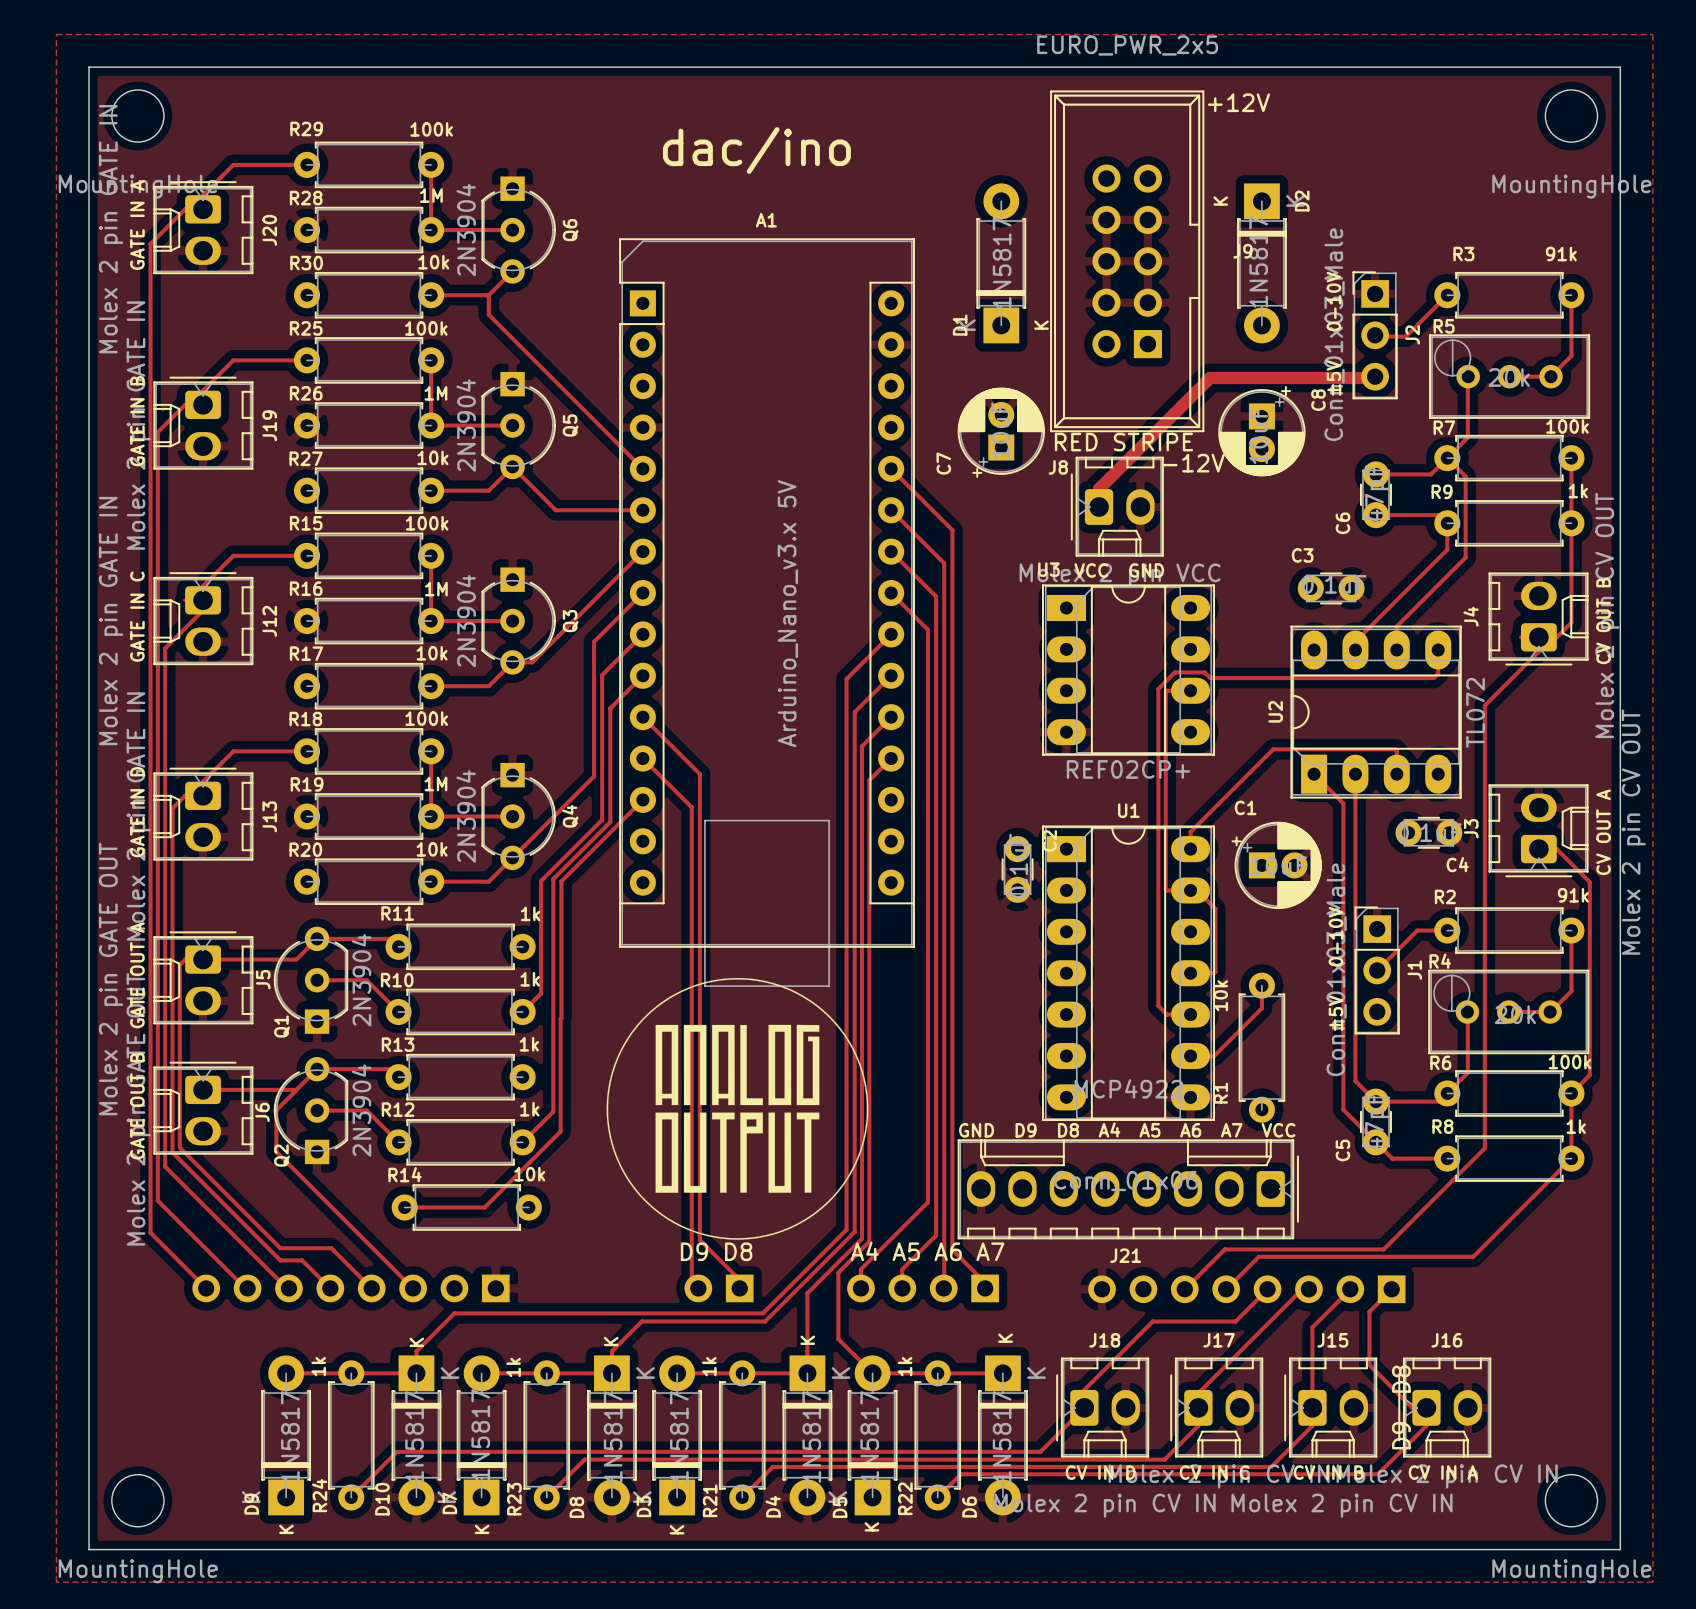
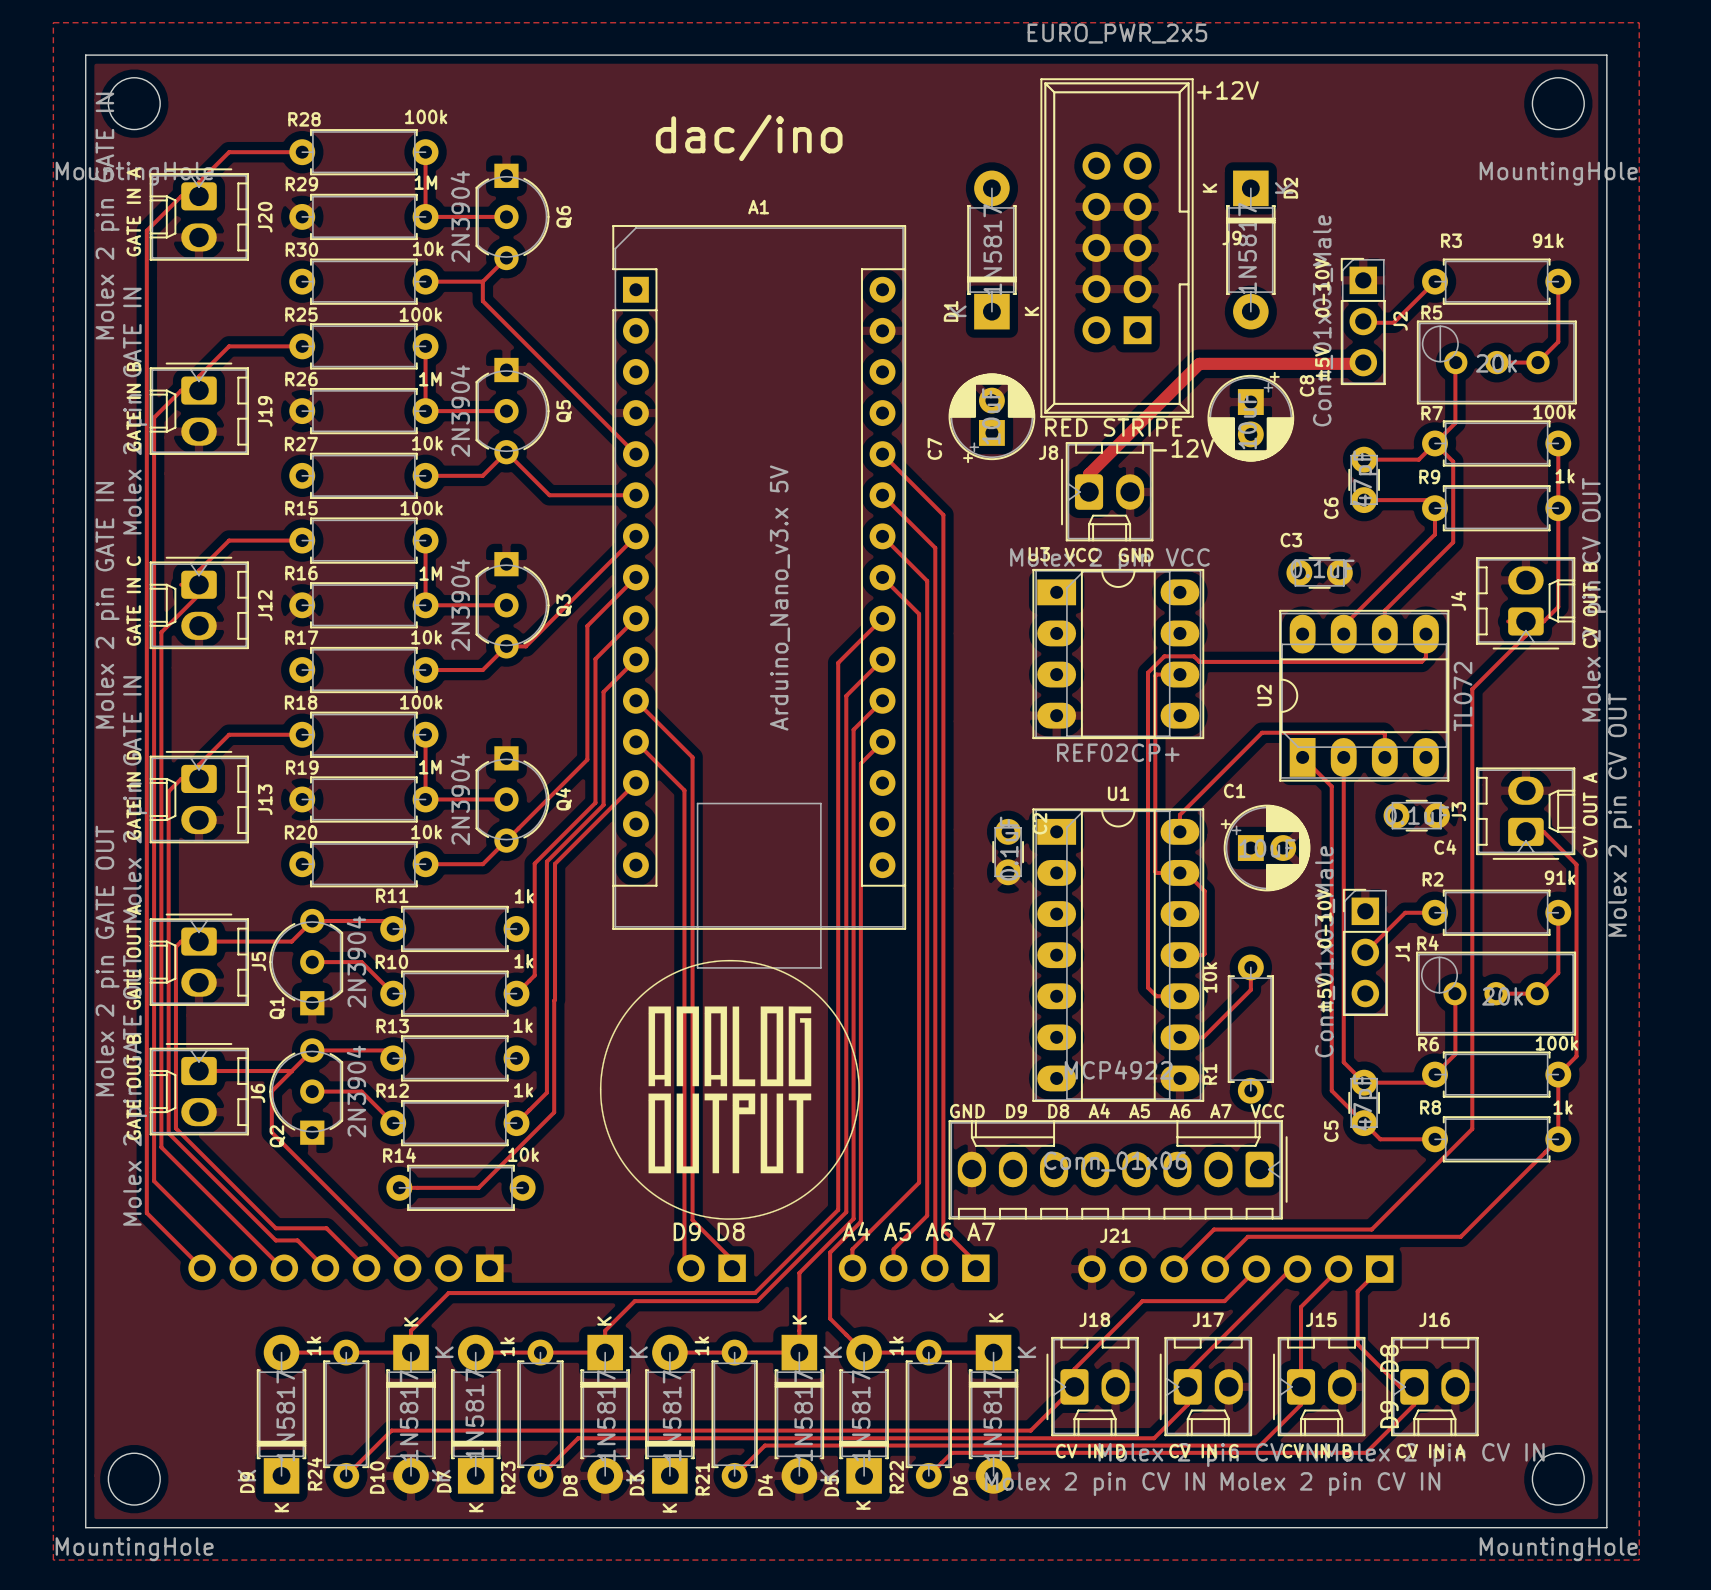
R29 name position: R29 (306, 128) -> R29 (301, 184)
R28 name position: R28 (306, 198) -> R28 (304, 119)

